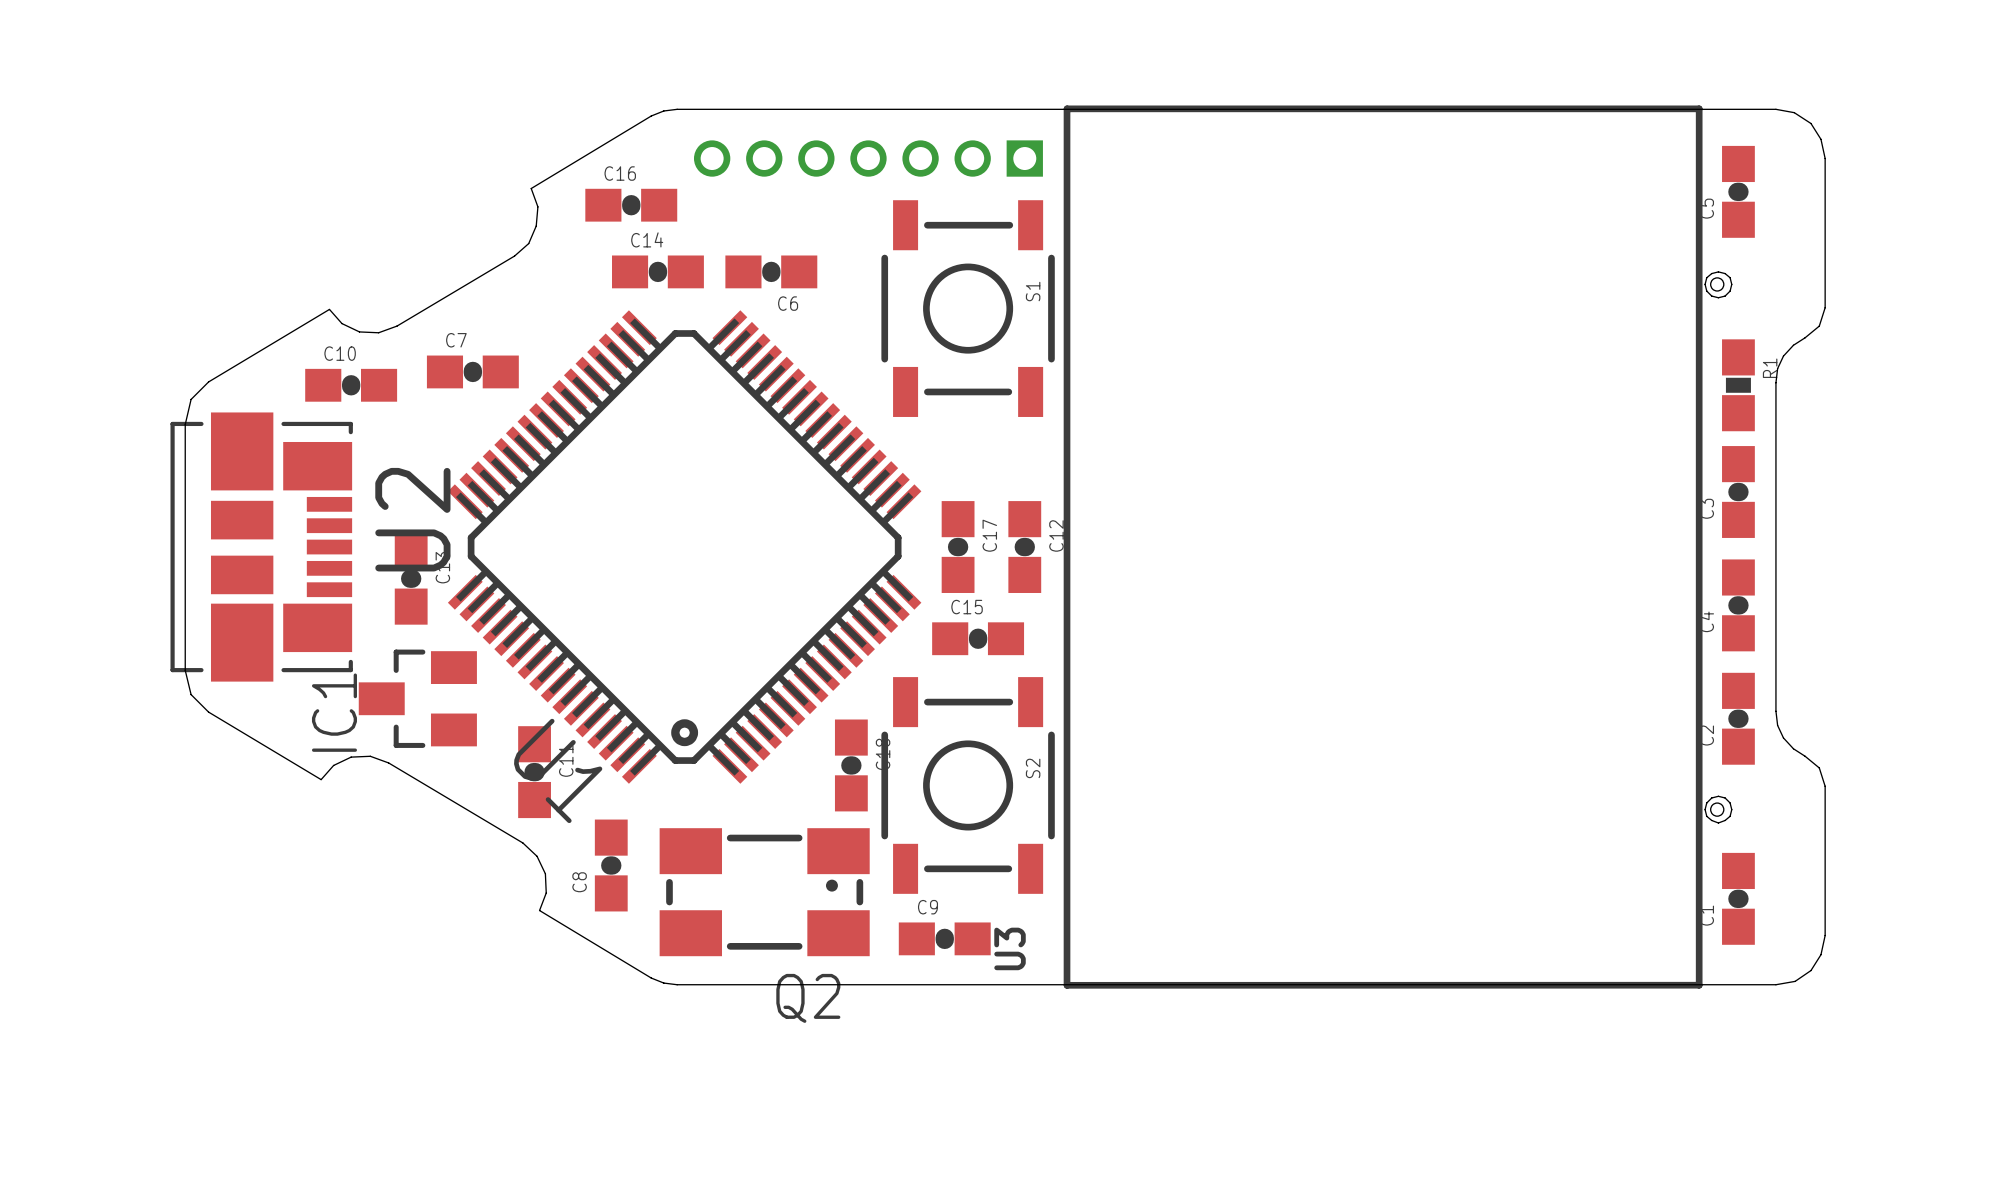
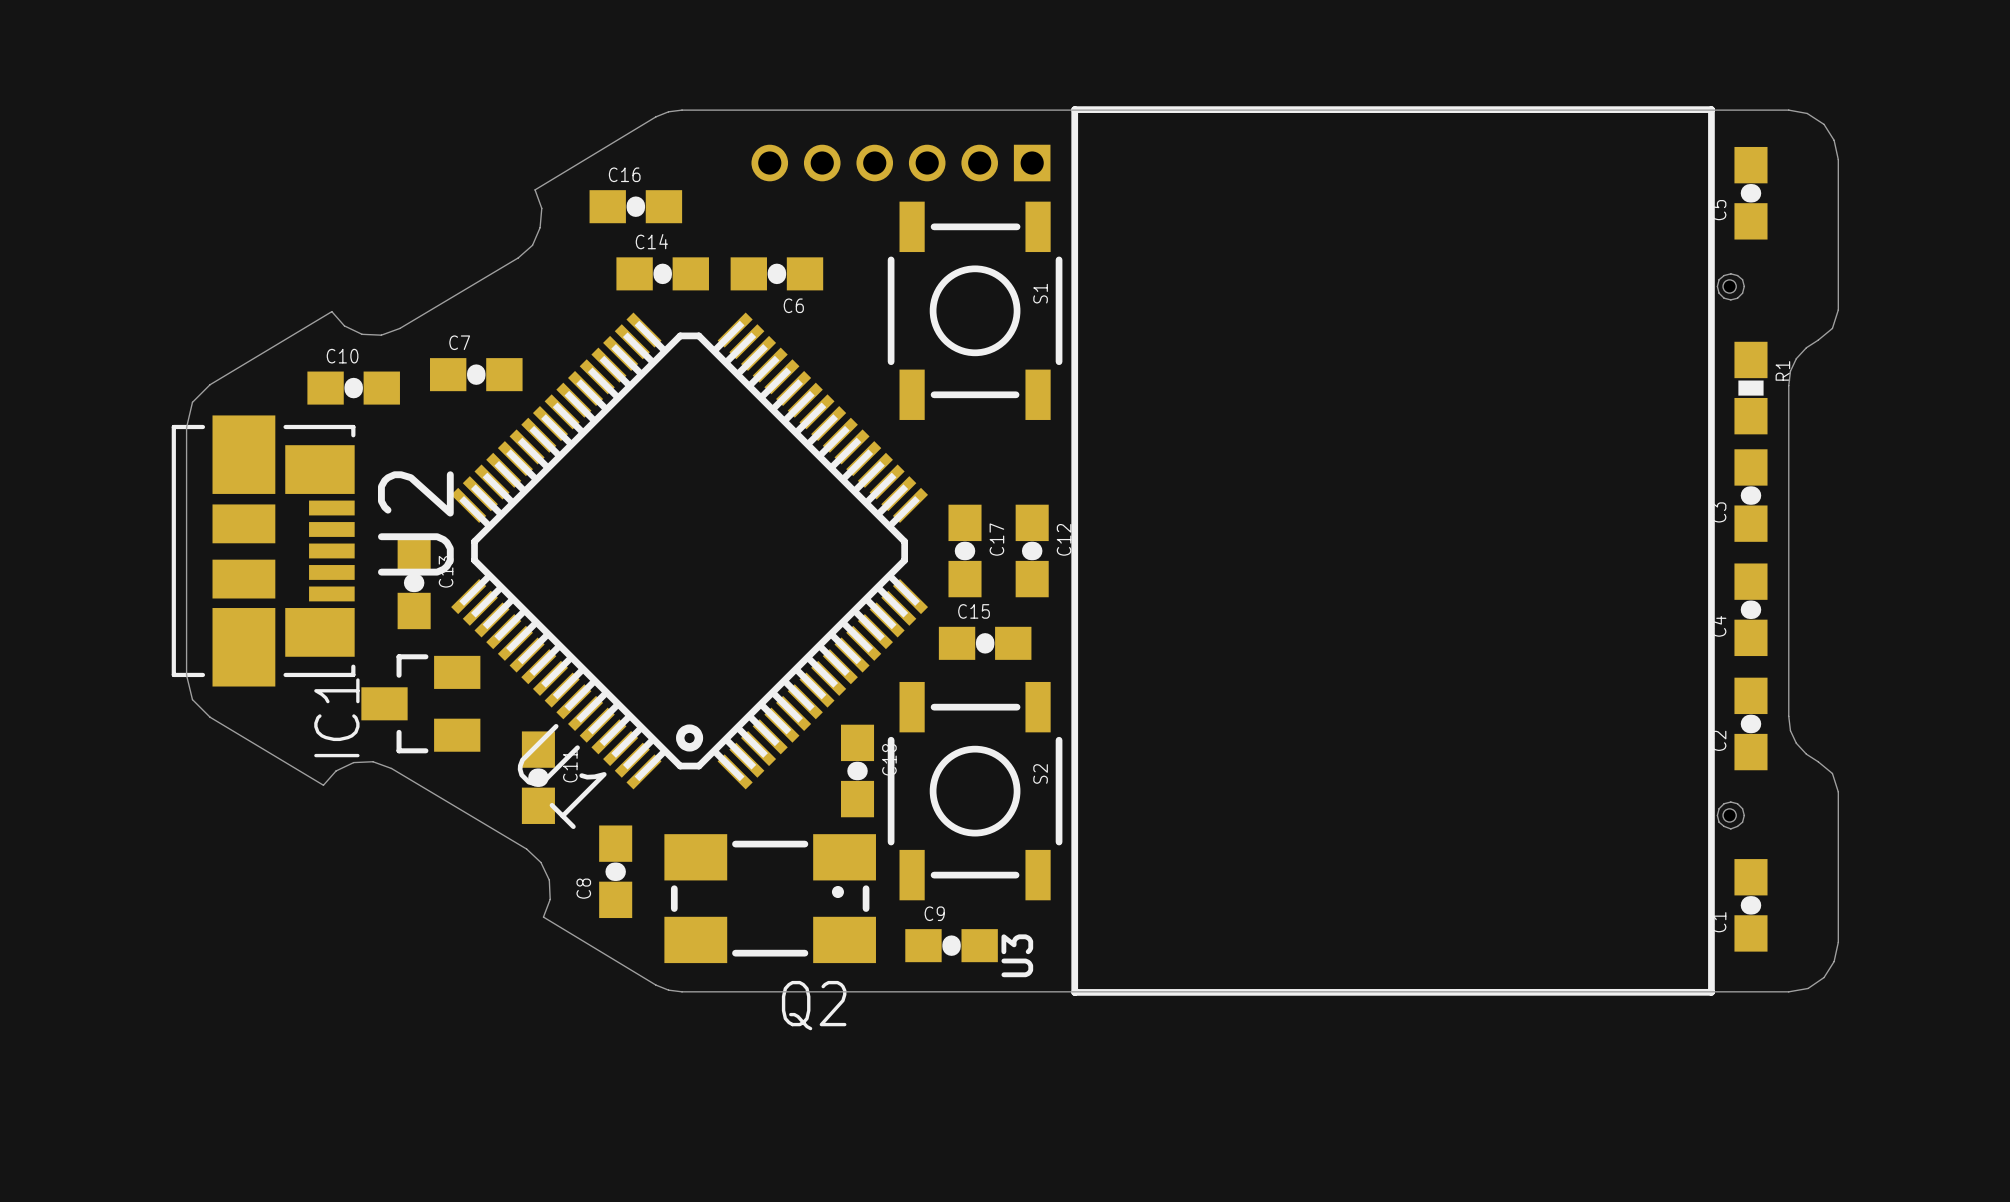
part footprint: [693, 140, 1043, 177] -> [751, 144, 1051, 182]

